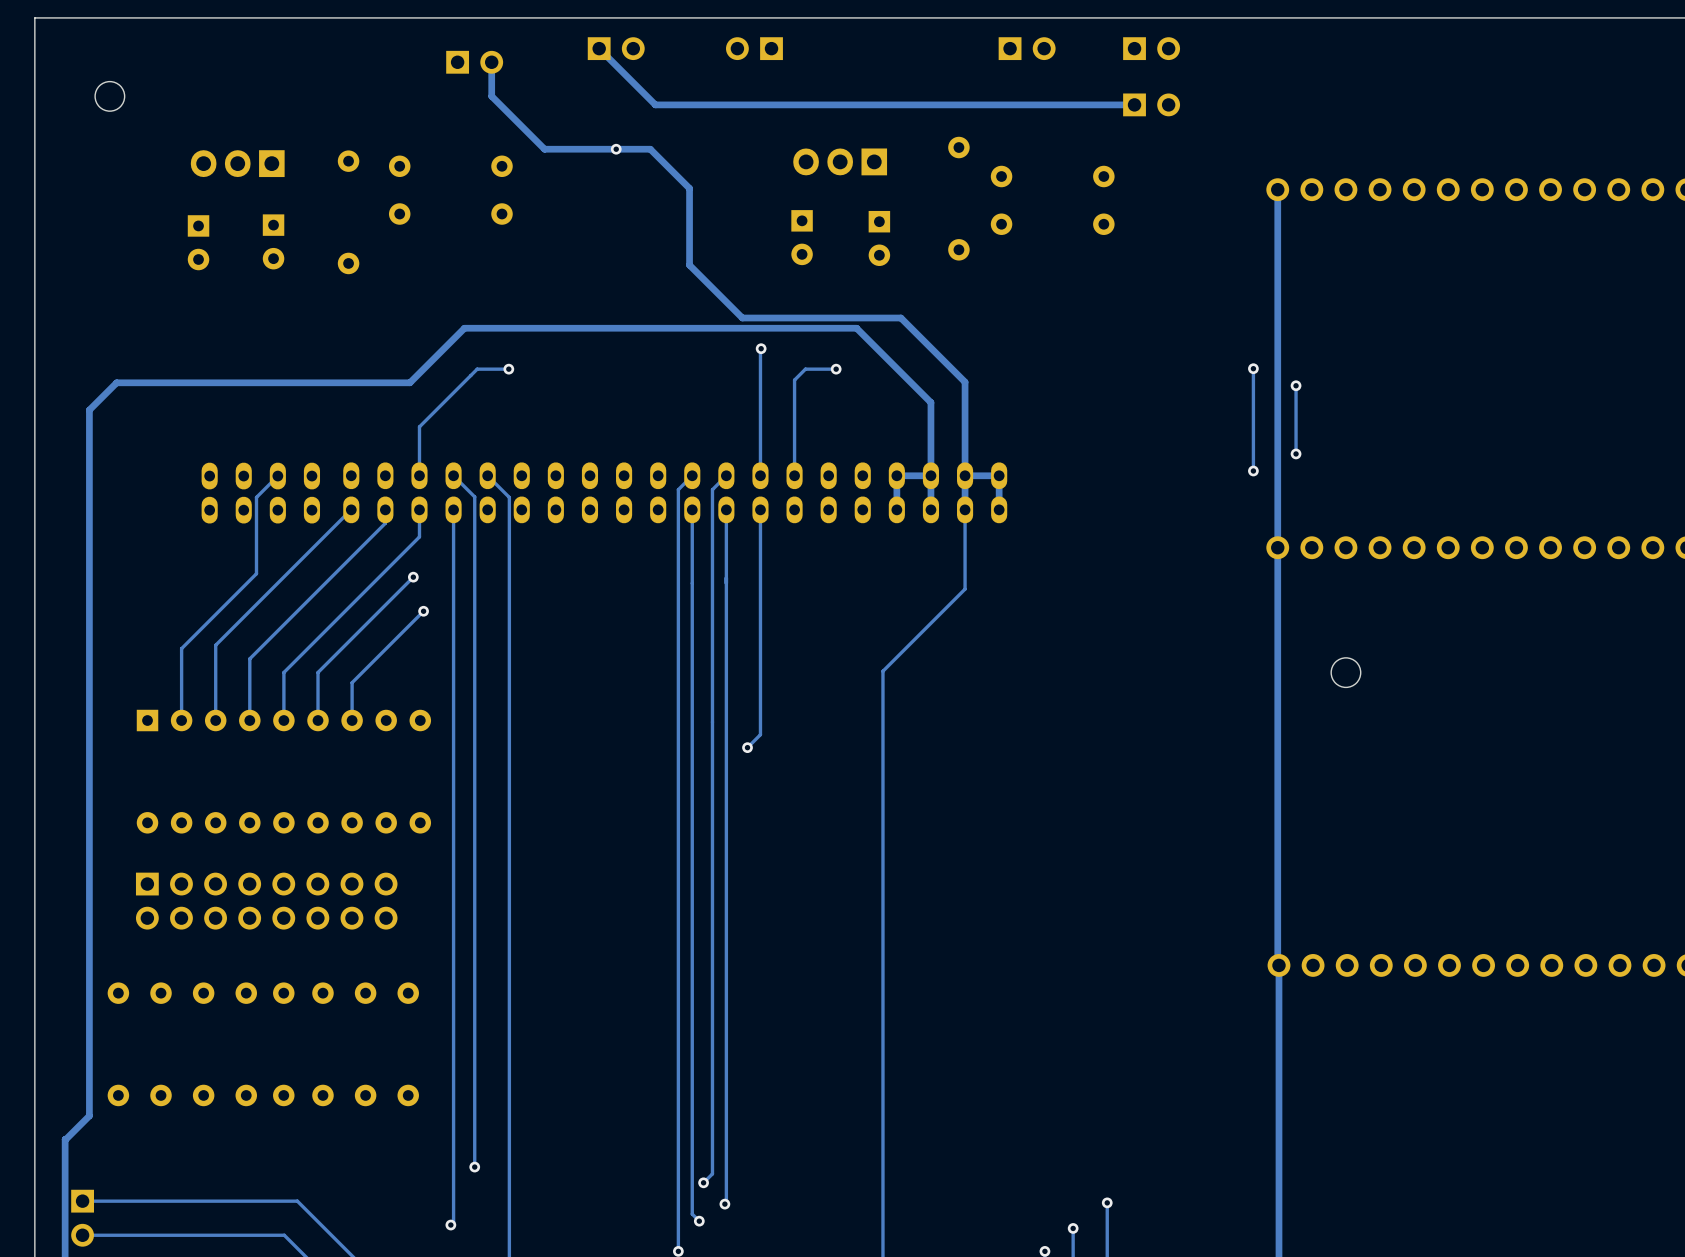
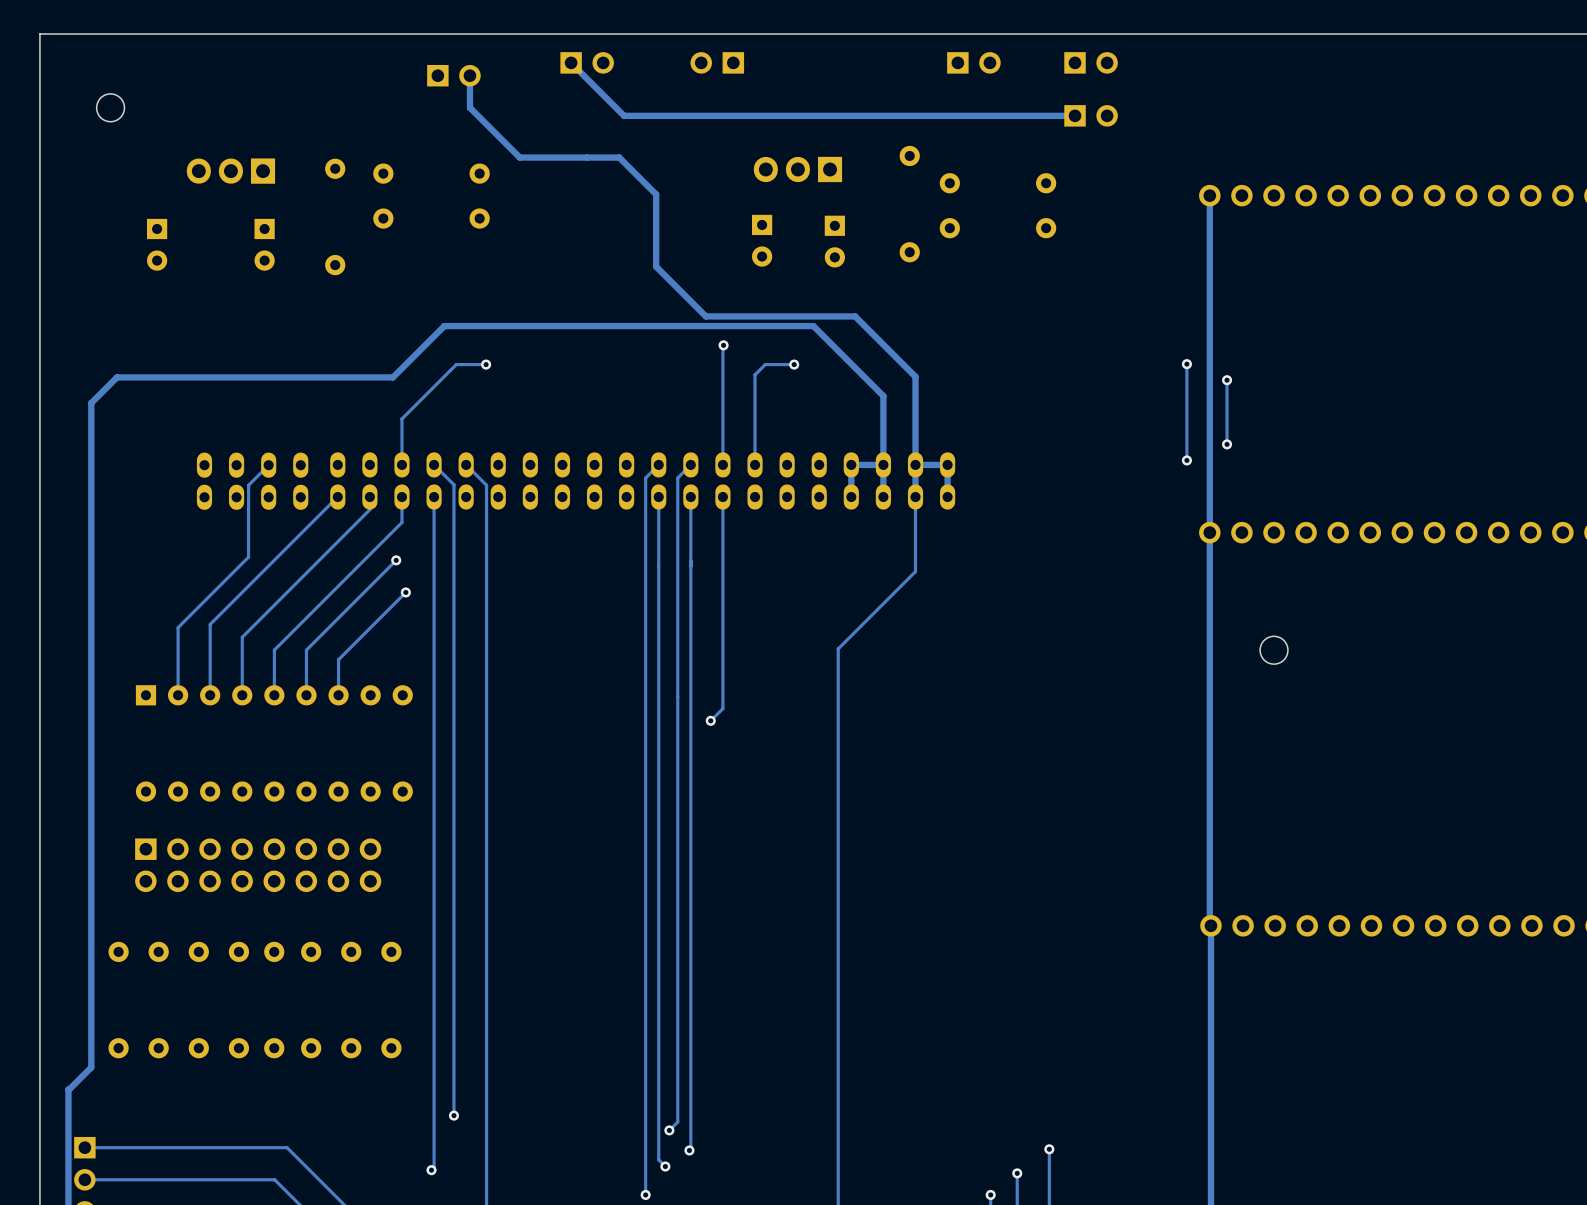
via: (616, 149) -> none
part position: (198, 242) -> (157, 244)

